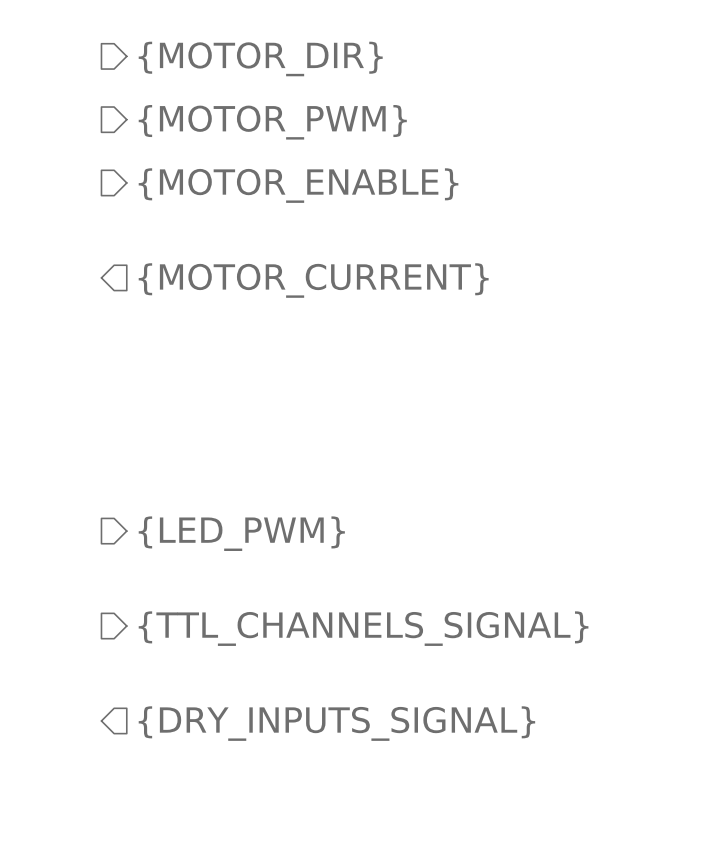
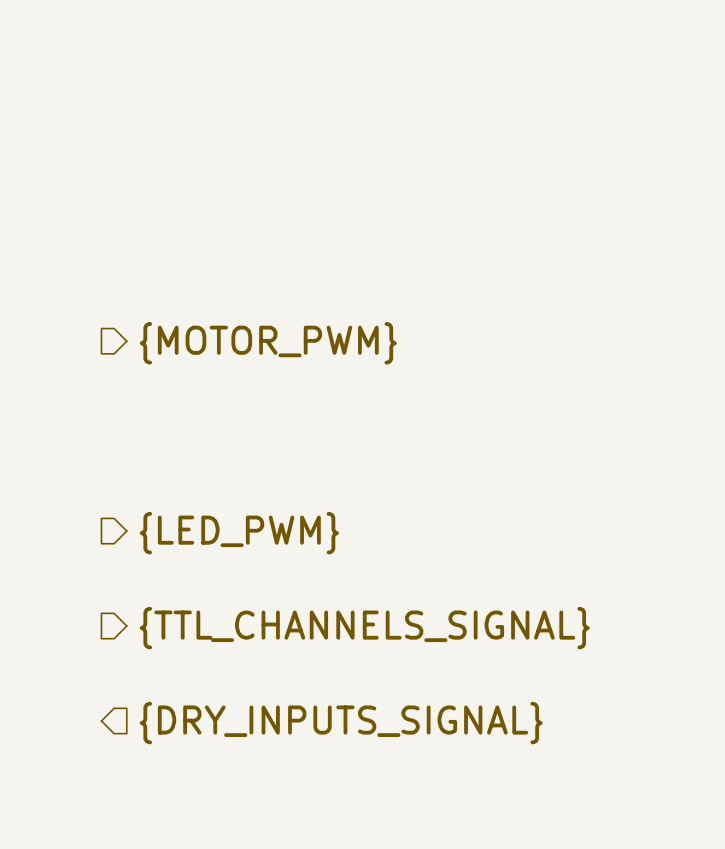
hierarchical label: {MOTOR_DIR} (260, 58) -> none
hierarchical label position: {MOTOR_PWM} (272, 122) -> {MOTOR_PWM} (268, 343)
hierarchical label: {MOTOR_ENABLE} (298, 185) -> none
hierarchical label: {MOTOR_CURRENT} (313, 280) -> none

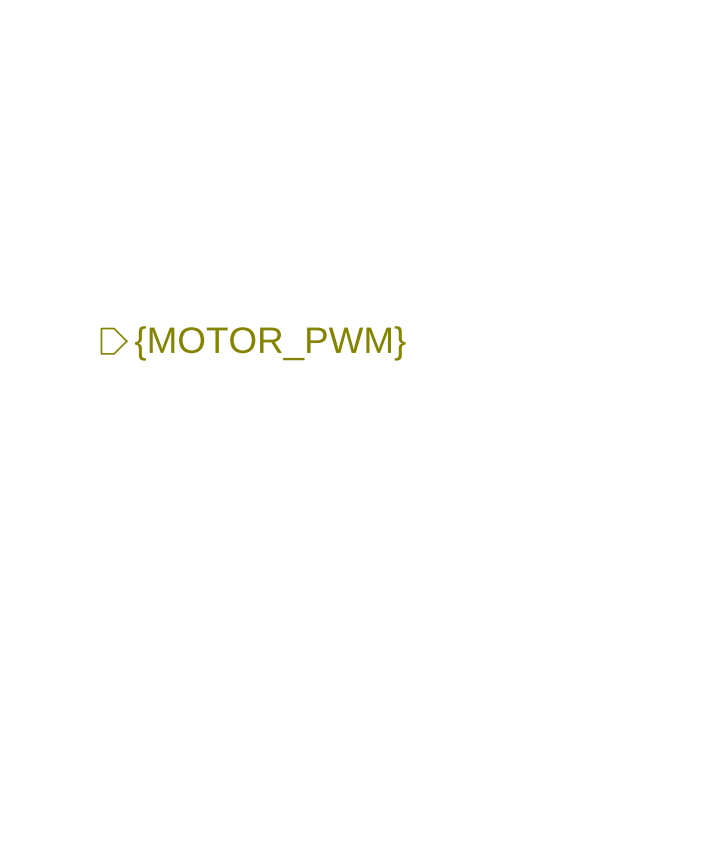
hierarchical label: {LED_PWM} (239, 533) -> none
hierarchical label: {TTL_CHANNELS_SIGNAL} (364, 628) -> none
hierarchical label: {DRY_INPUTS_SIGNAL} (341, 723) -> none

